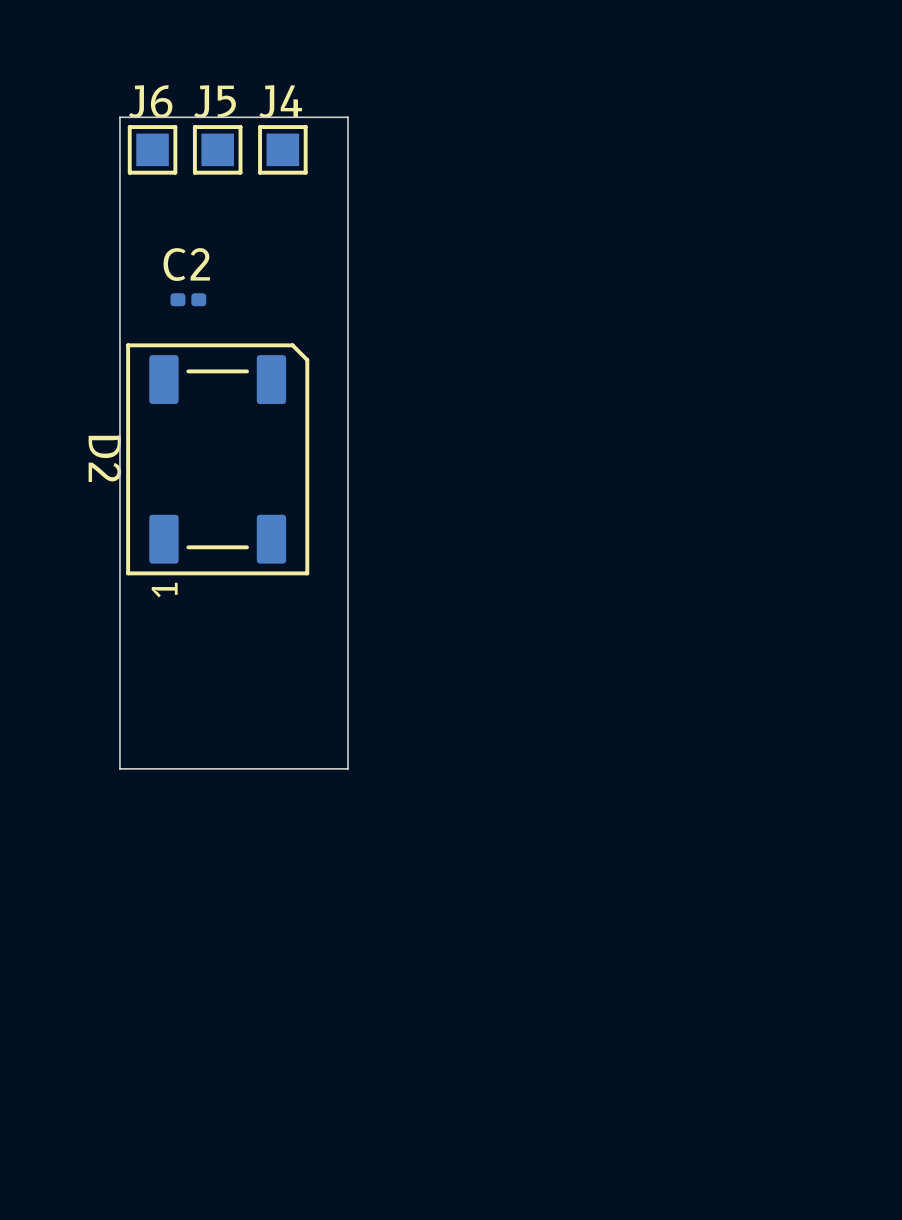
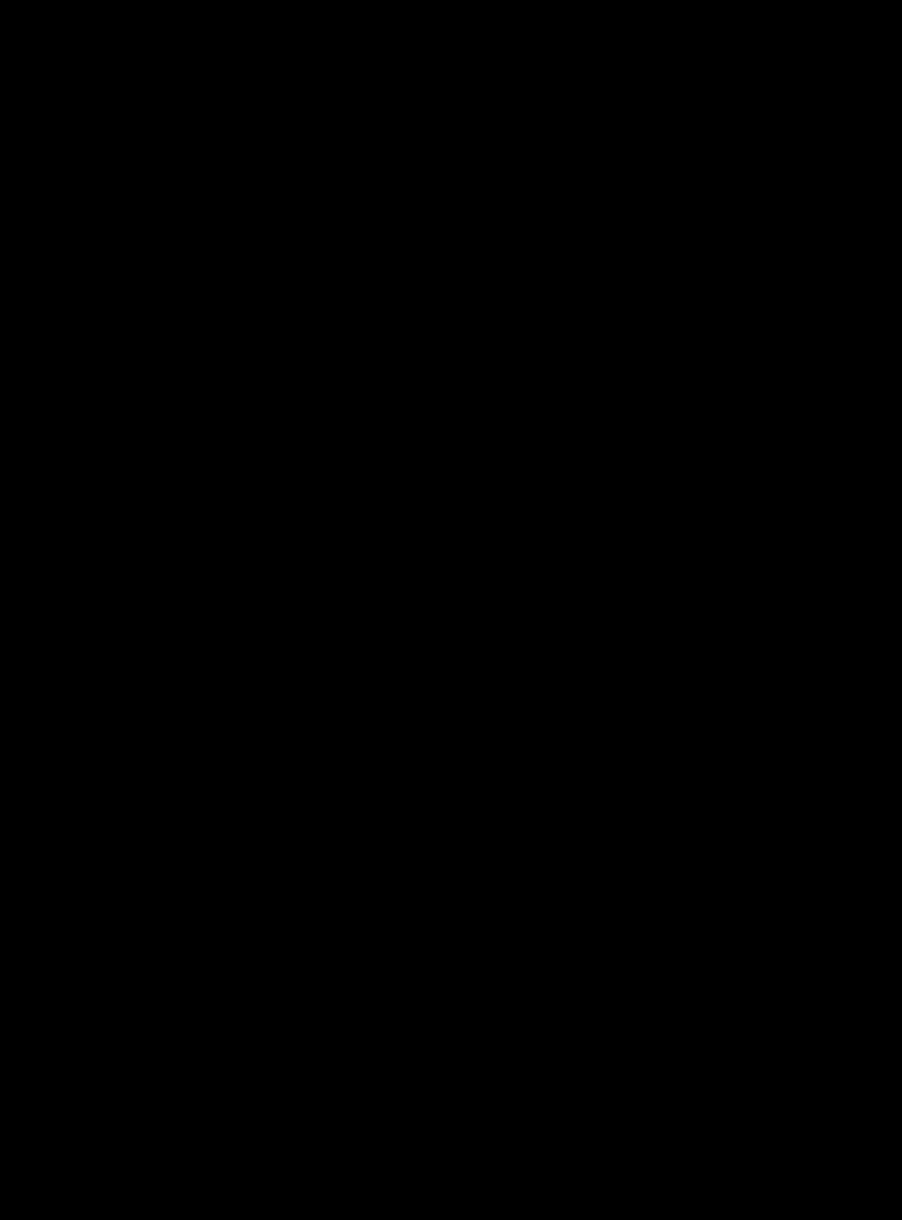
board edge: (348, 117) (119, 117) (119, 768) (348, 768) (348, 117) -> none
J6: (152, 149) -> none
J5: (217, 149) -> none
J4: (282, 149) -> none
C2: (188, 299) -> none
D2: (217, 459) -> none

